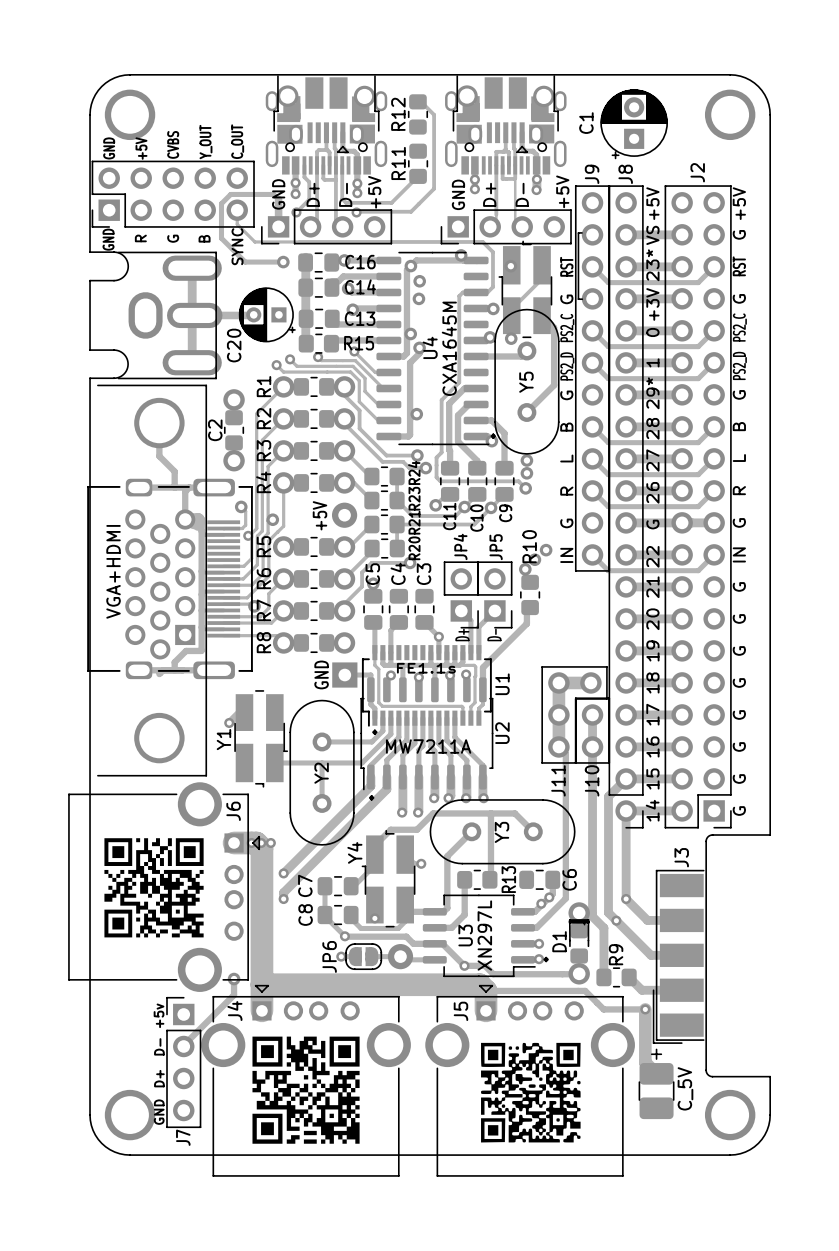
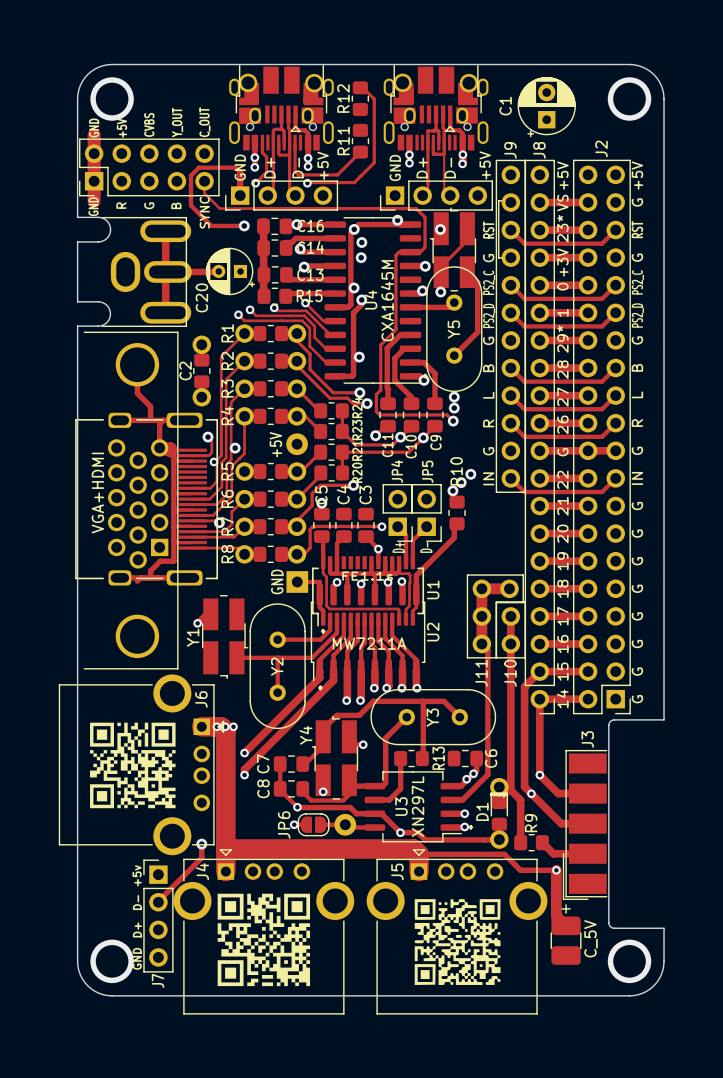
track: none -> (94, 134) (94, 201)
track: none -> (381, 526) (313, 526) (310, 529) (310, 548) (303, 554) (296, 554)
via: none -> (381, 526)

